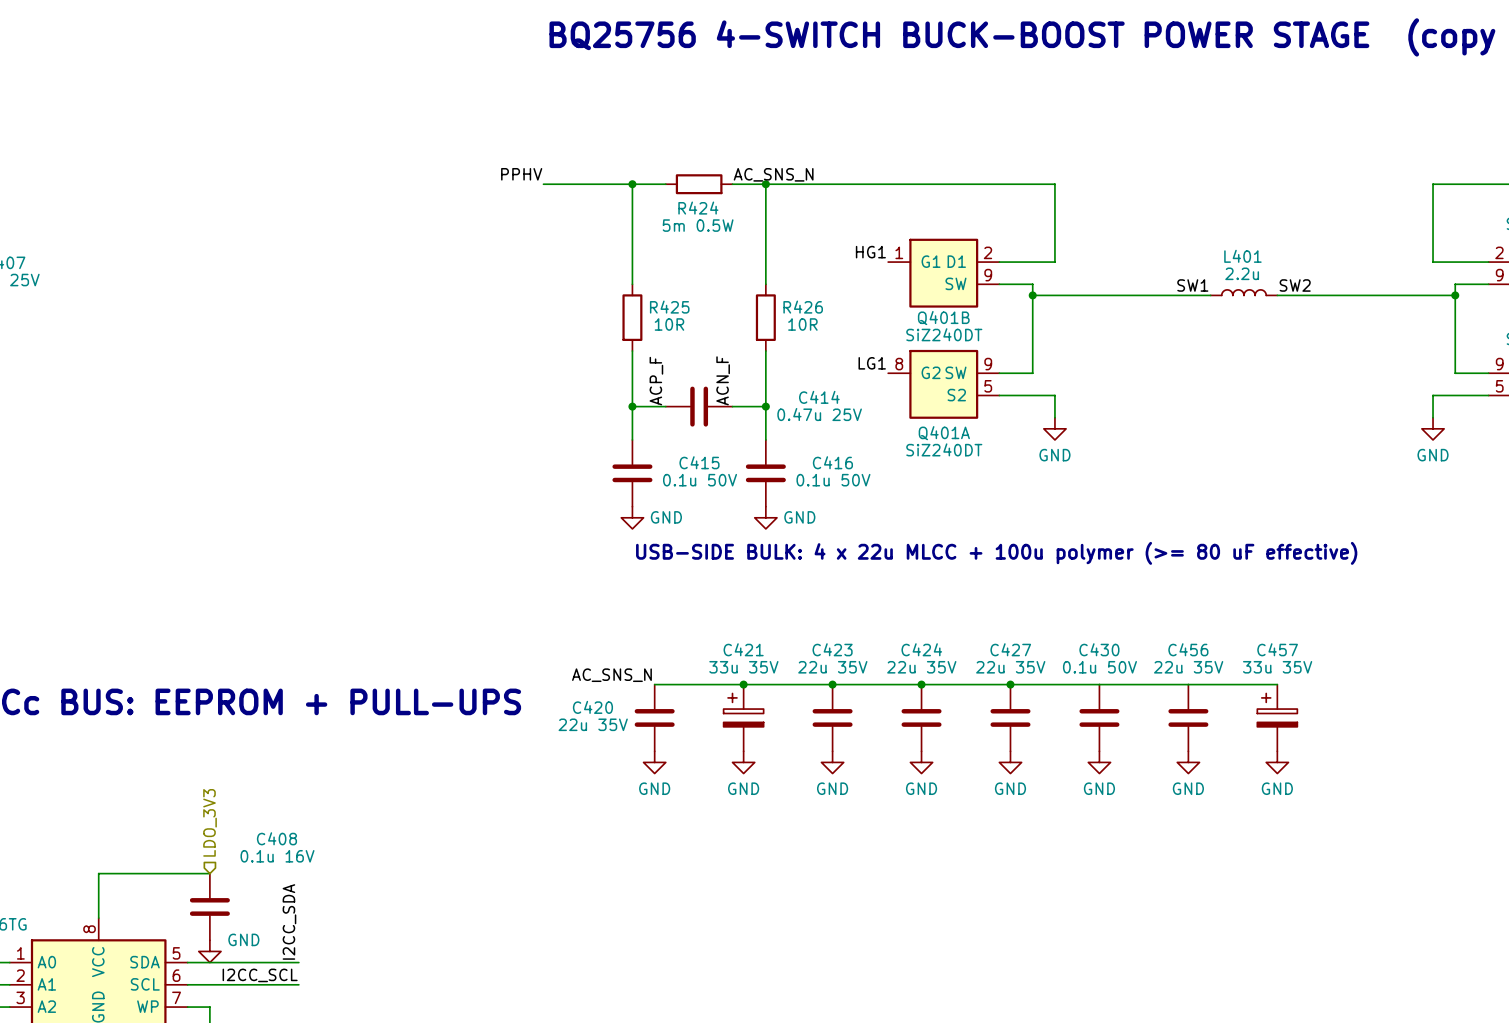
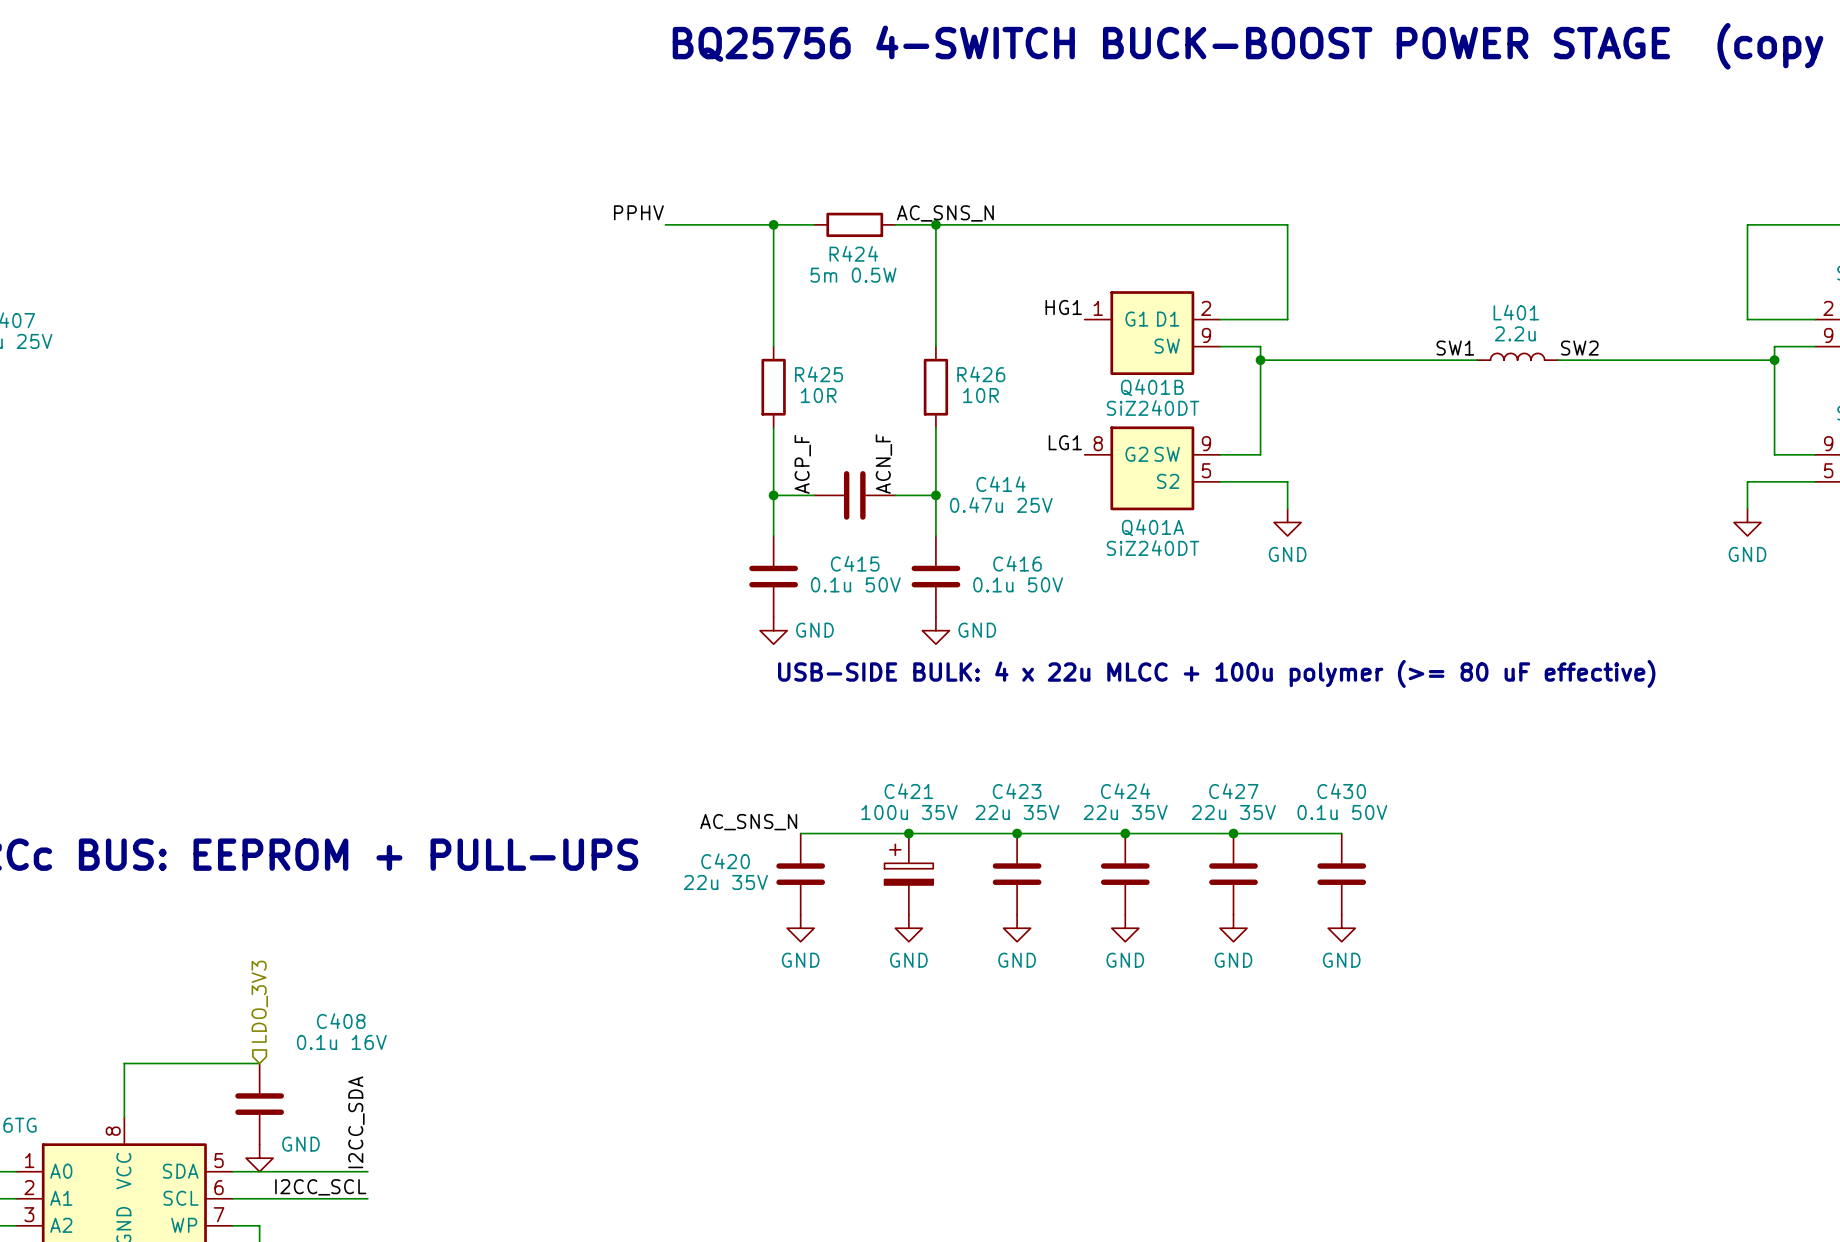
C421 value: 33u 35V (743, 667) -> 100u 35V (909, 812)
wire: (1099, 684) (1277, 684) -> none
C456: 22u 35V (1188, 717) -> none
C457: 33u 35V (1277, 717) -> none
power symbol: GND (1188, 762) -> none
power symbol: GND (1277, 762) -> none

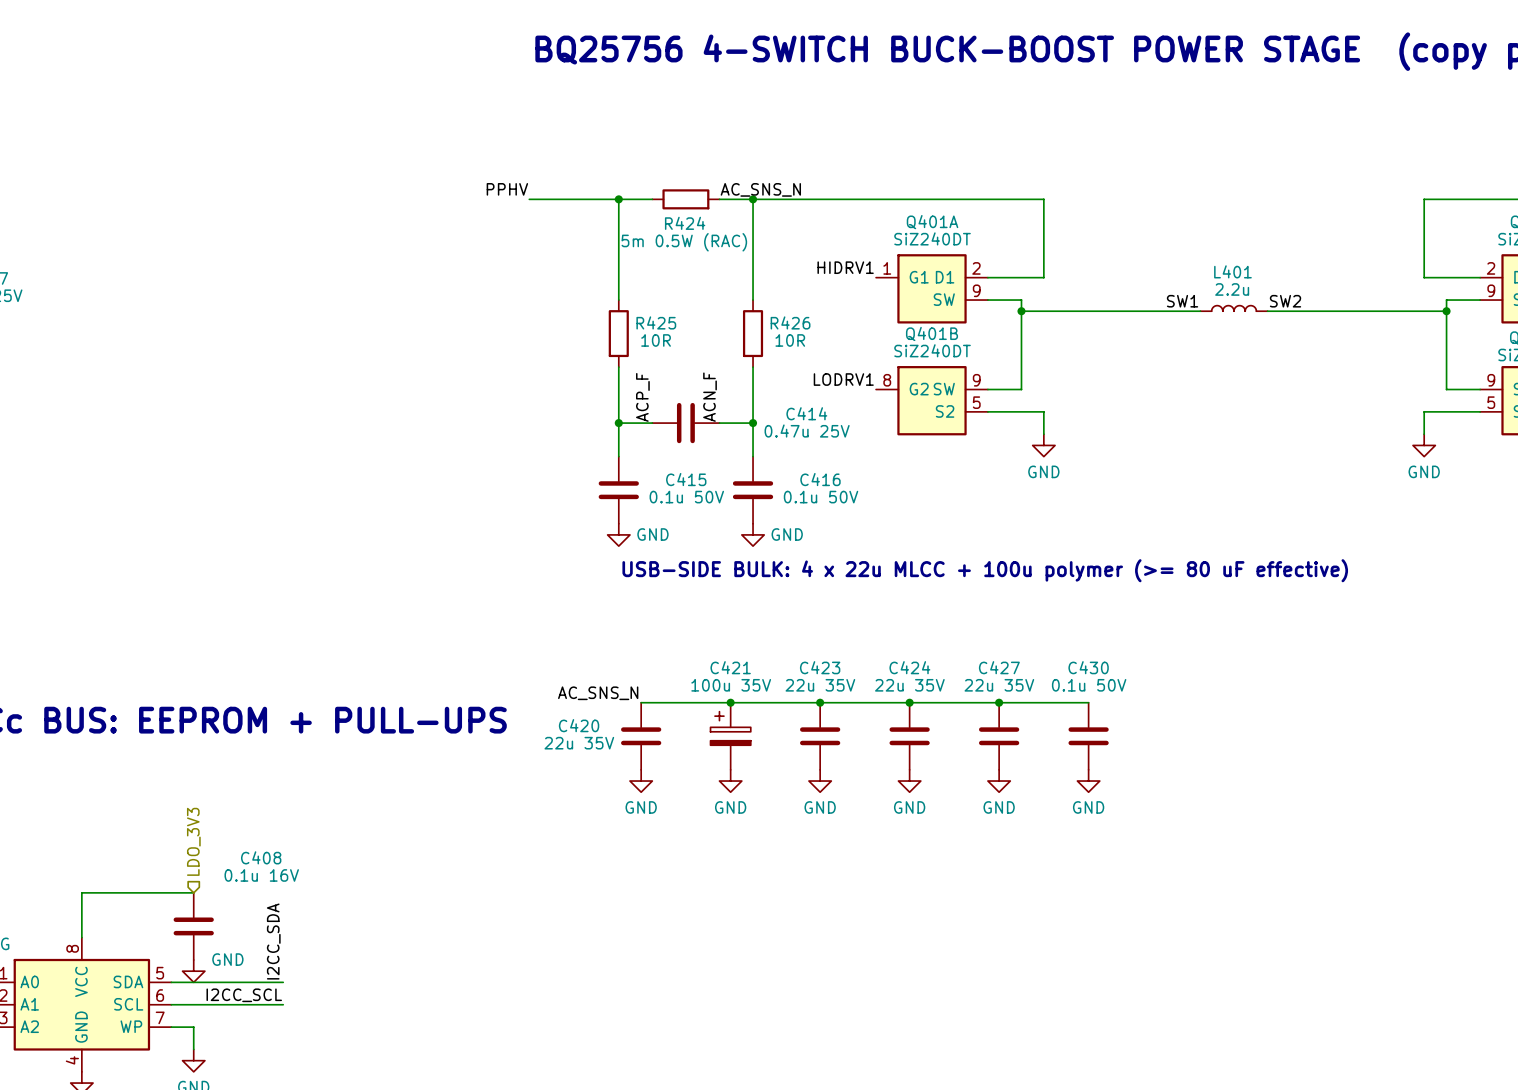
R424 value: 5m 0.5W (853, 275) -> 5m 0.5W (RAC) (684, 242)
label: HG1 (1063, 307) -> HIDRV1 (845, 267)
label: LG1 (1065, 442) -> LODRV1 (843, 379)
Q401A name position: Q401A (1152, 527) -> Q401A (932, 222)
Q401A value position: SiZ240DT (1152, 548) -> SiZ240DT (932, 238)

